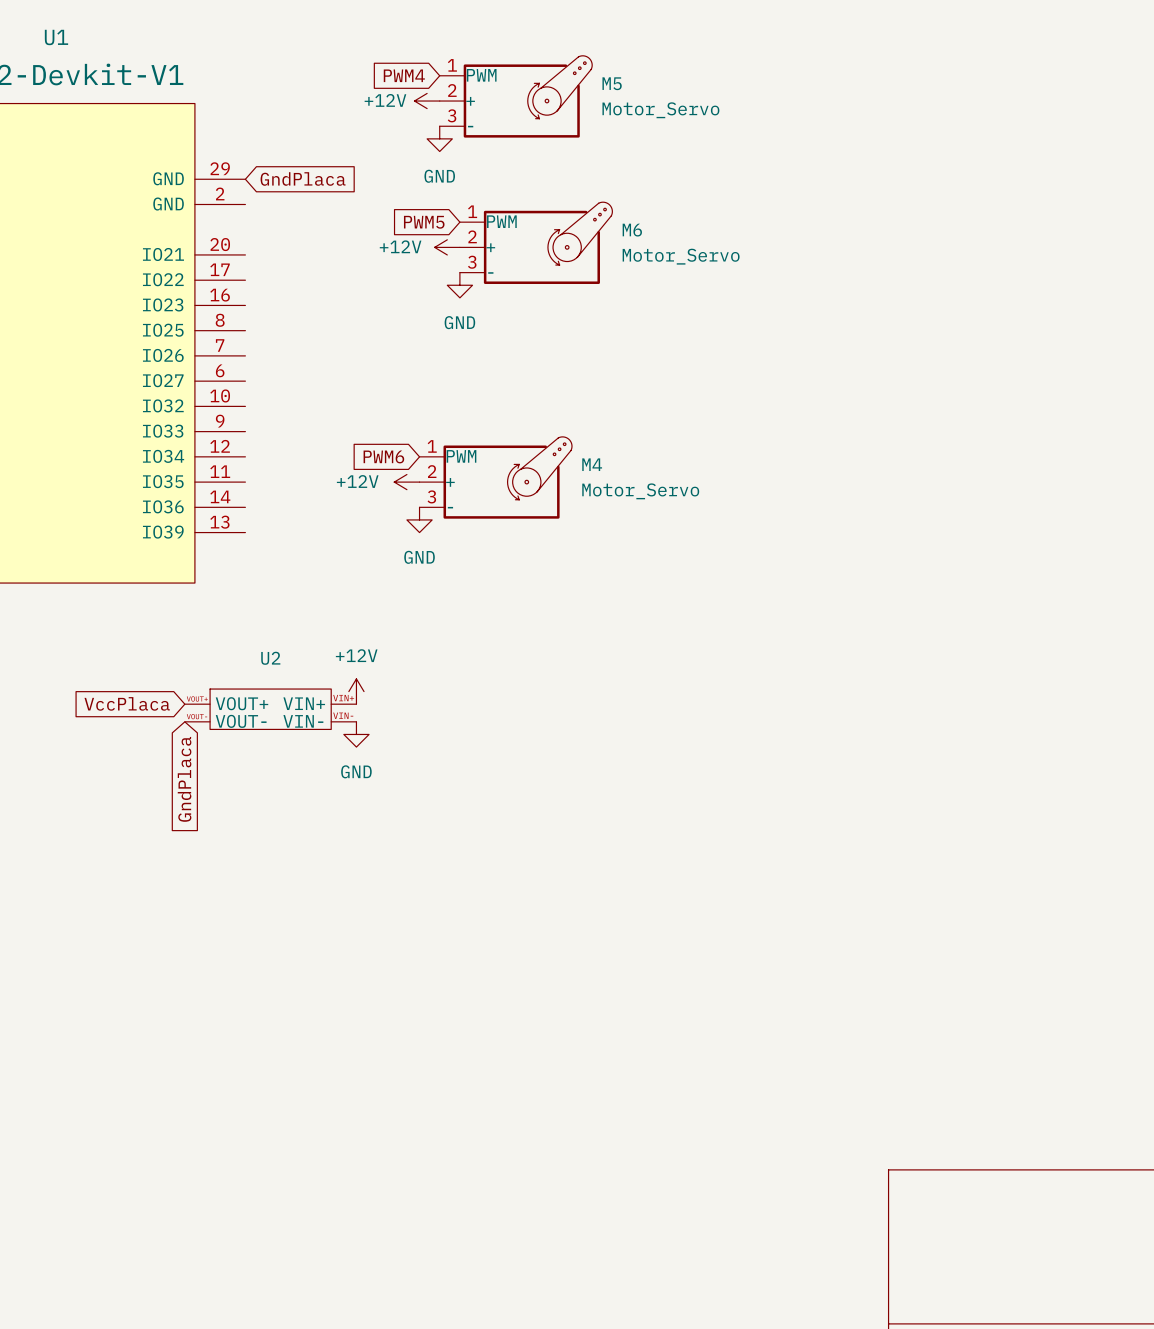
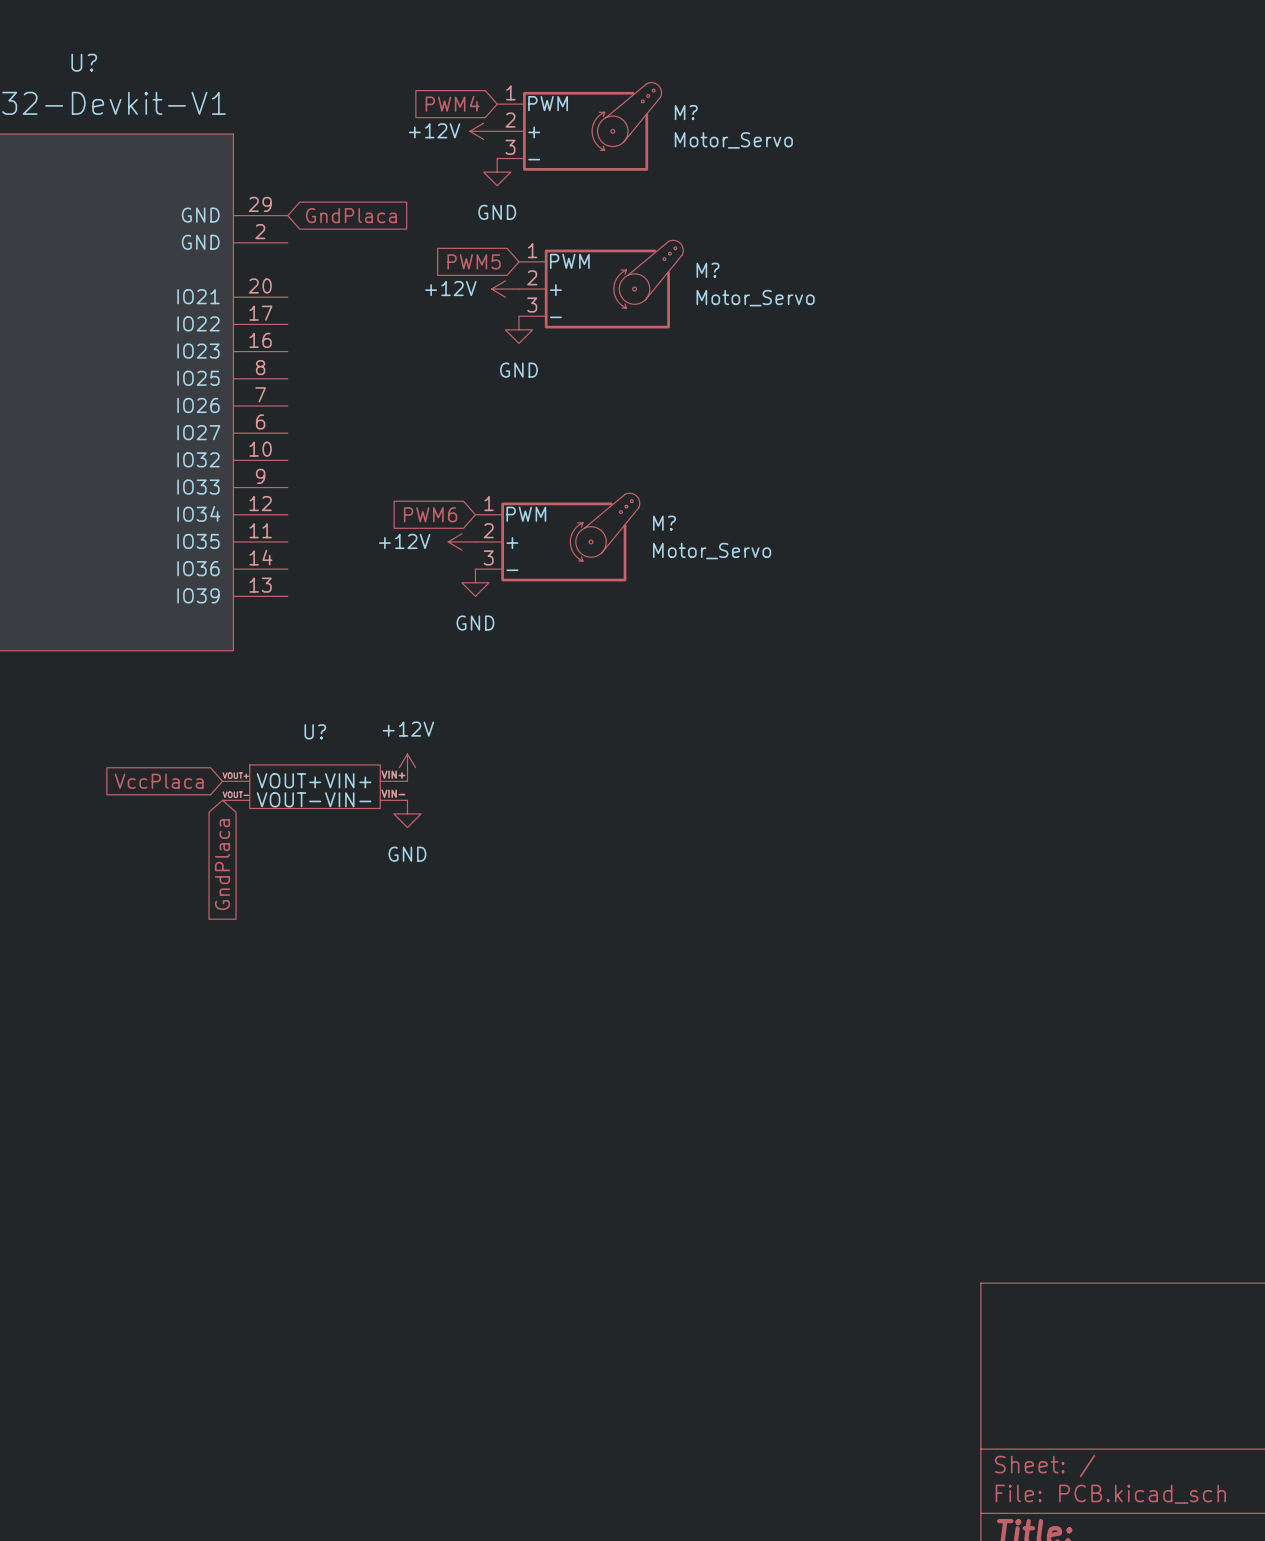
U1 name: U1 (56, 37) -> U? (84, 62)
M5 name: M5 (612, 83) -> M? (686, 112)
M6 name: M6 (632, 230) -> M? (708, 270)
M4 name: M4 (592, 464) -> M? (664, 523)
U2 name: U2 (270, 658) -> U? (315, 731)

